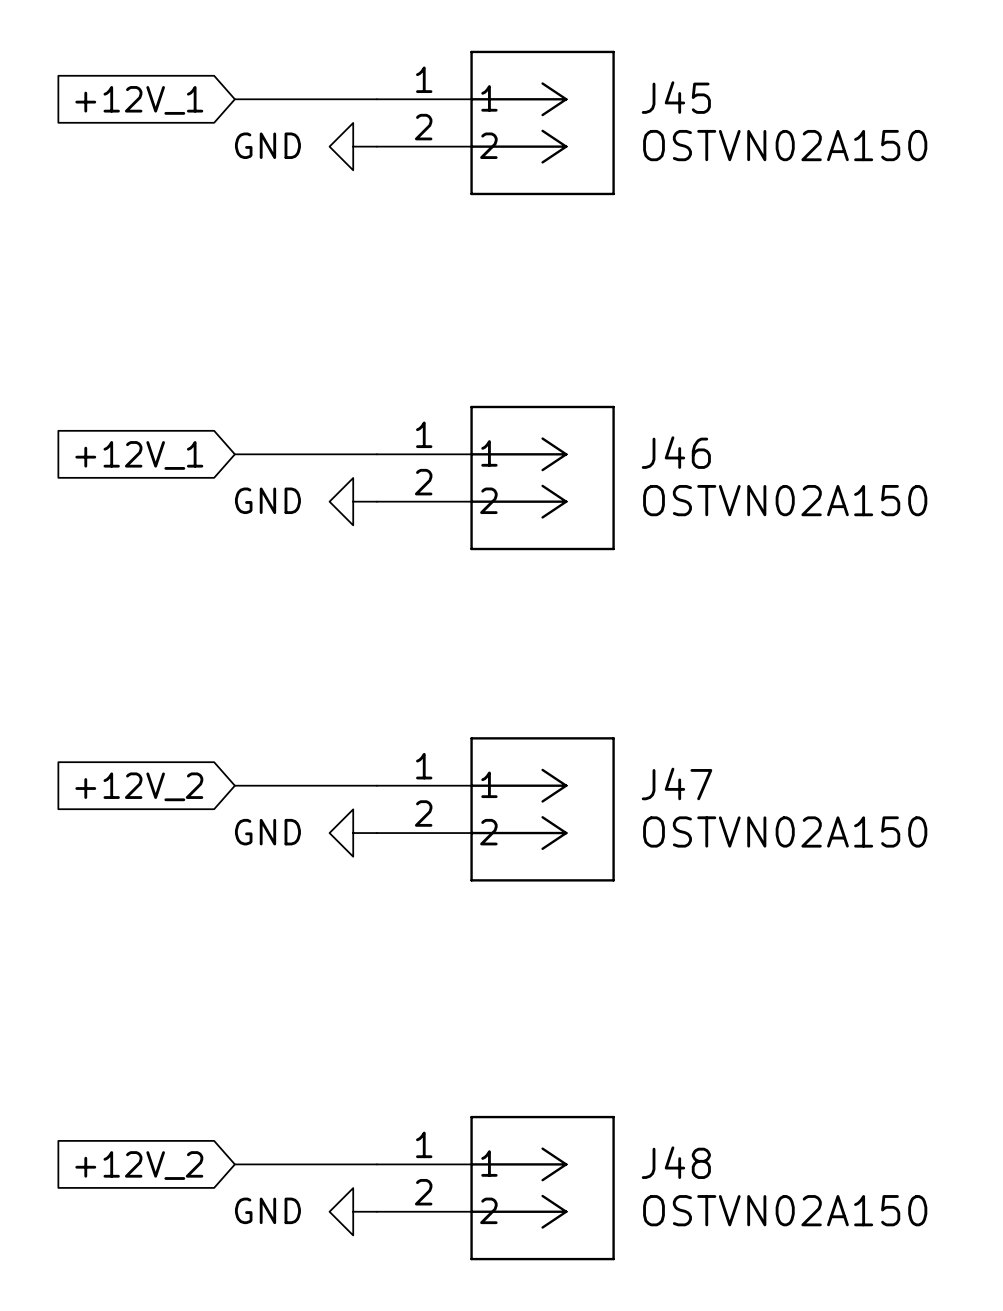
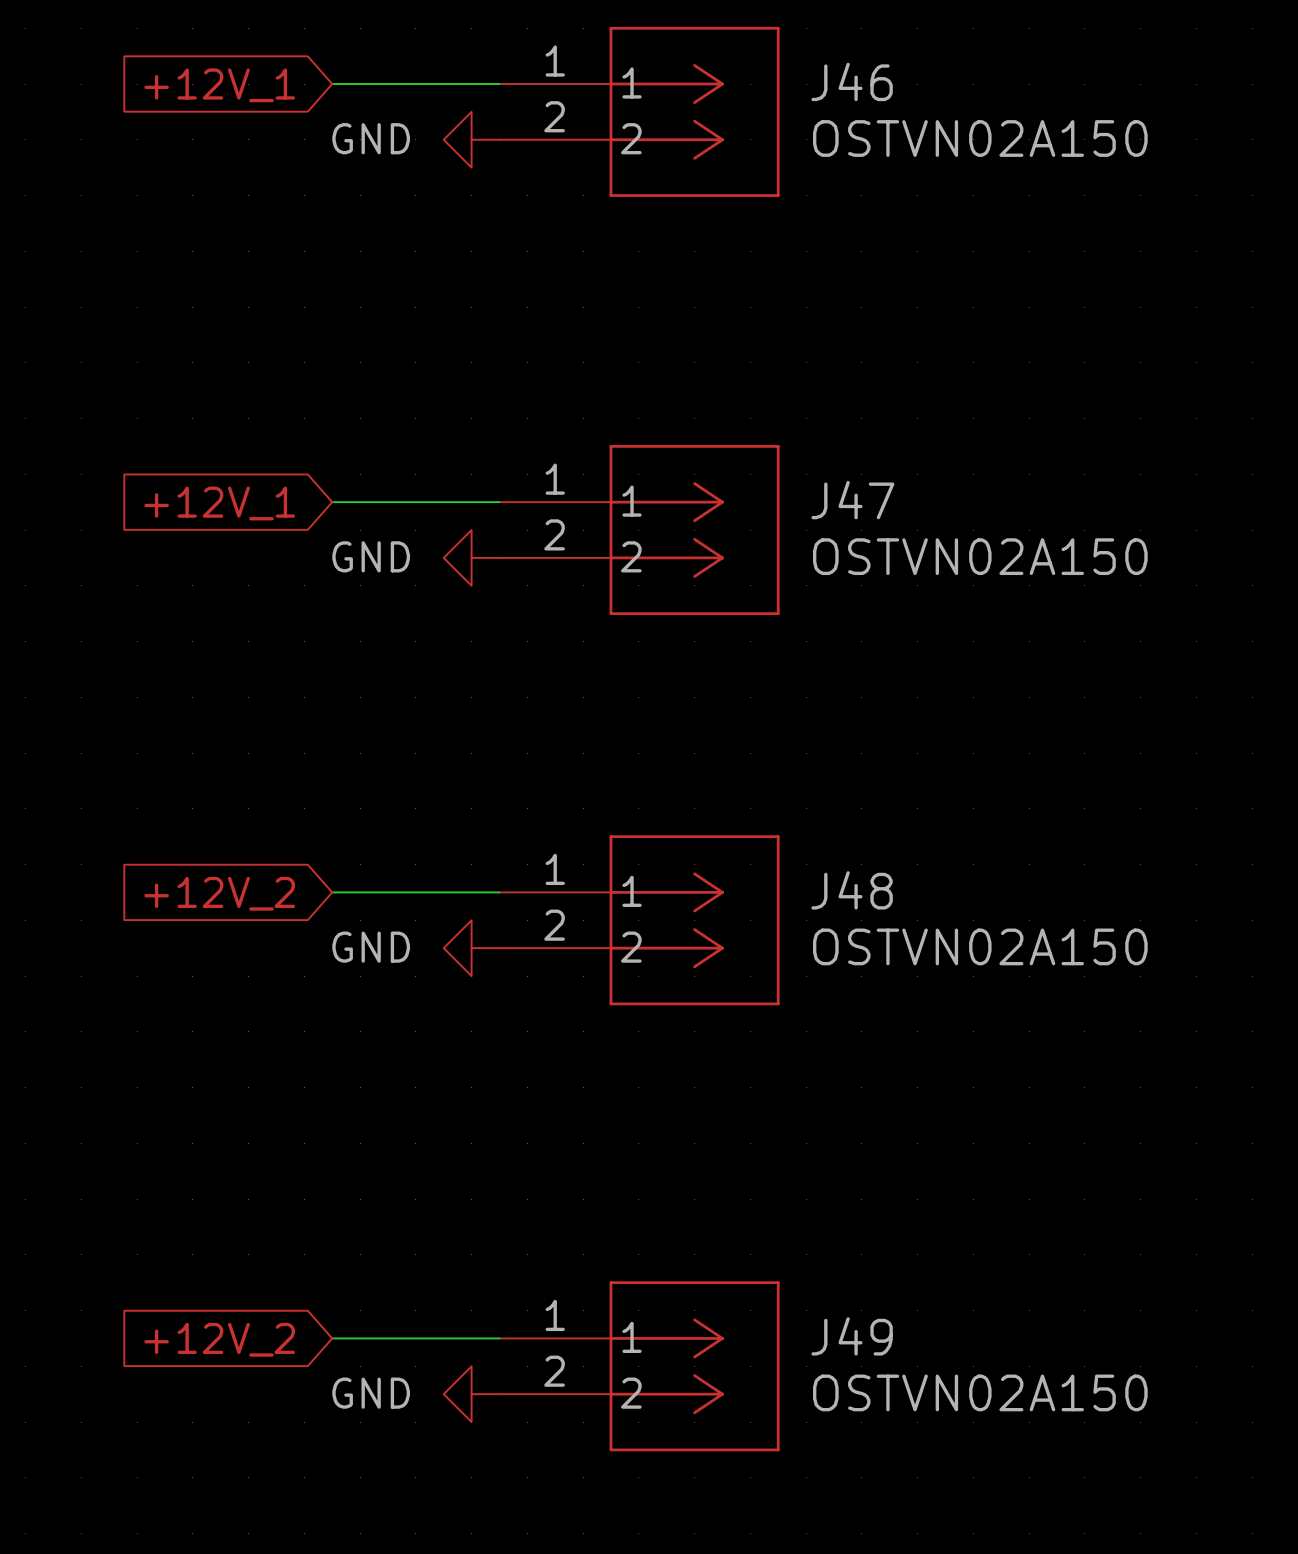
J45 name: J45 (676, 97) -> J46 (852, 81)
J46 name: J46 (676, 452) -> J47 (852, 500)
J47 name: J47 (676, 783) -> J48 (852, 890)
J48 name: J48 (676, 1162) -> J49 (852, 1336)

